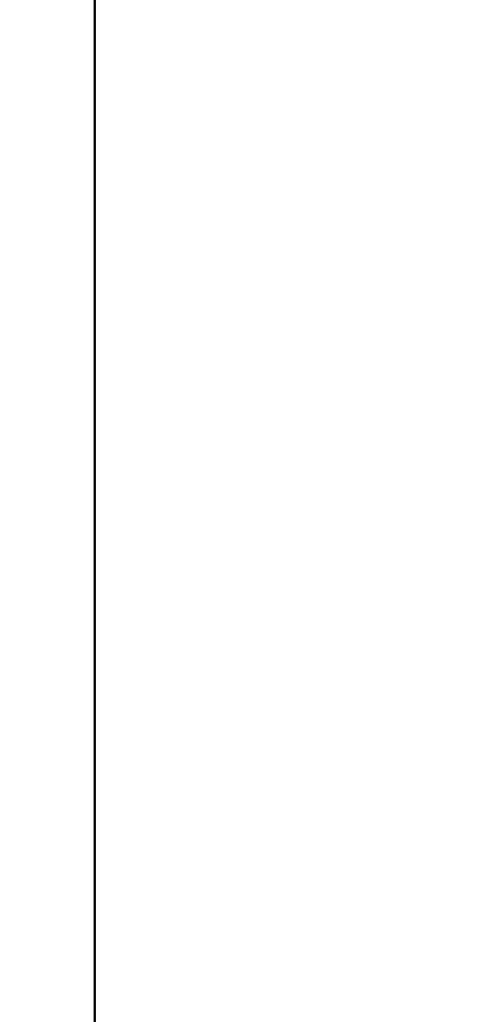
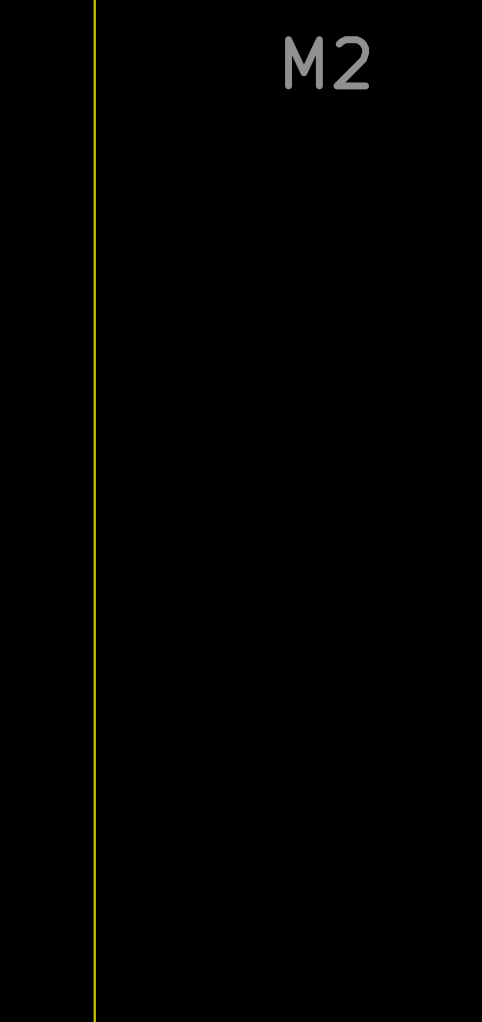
part value: none -> M2 (327, 62)

